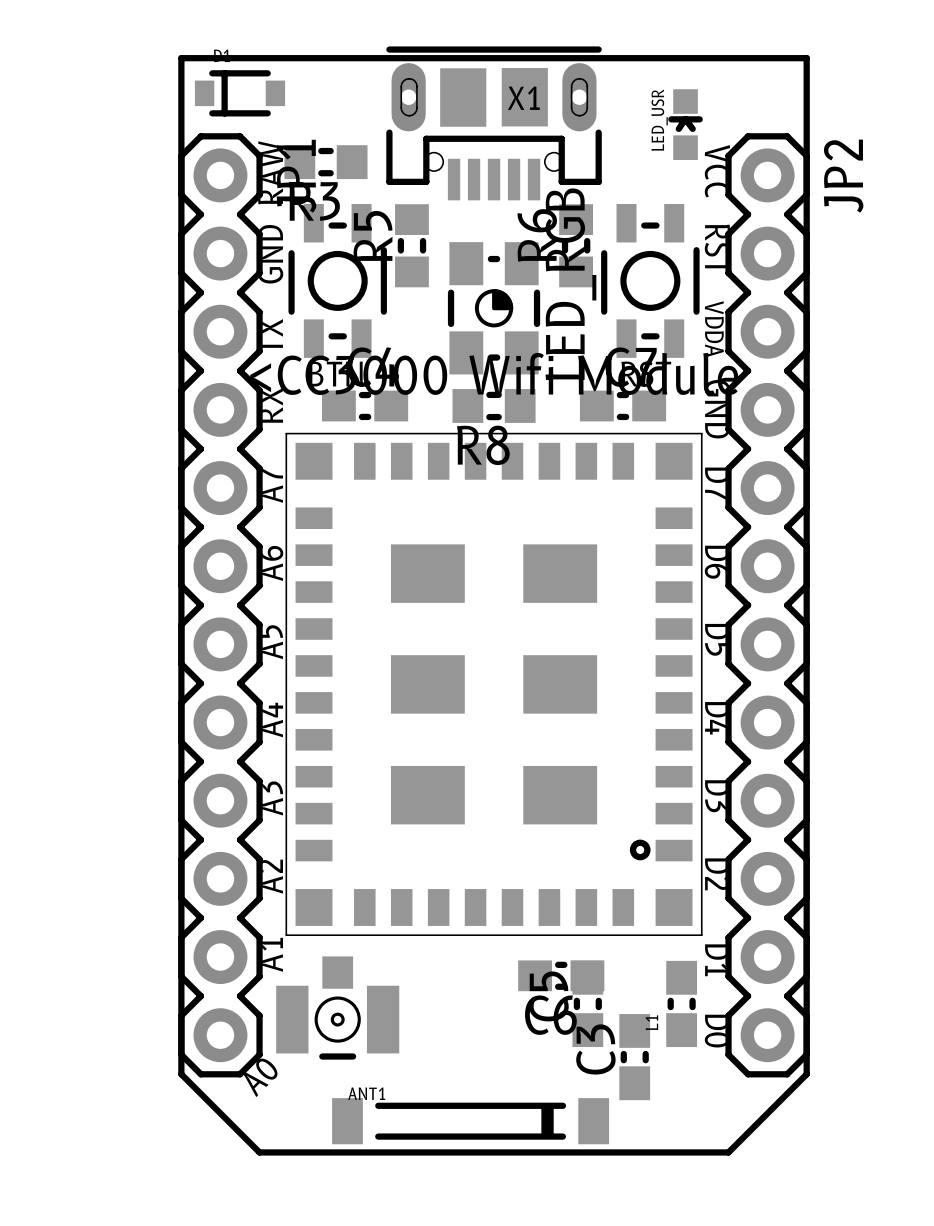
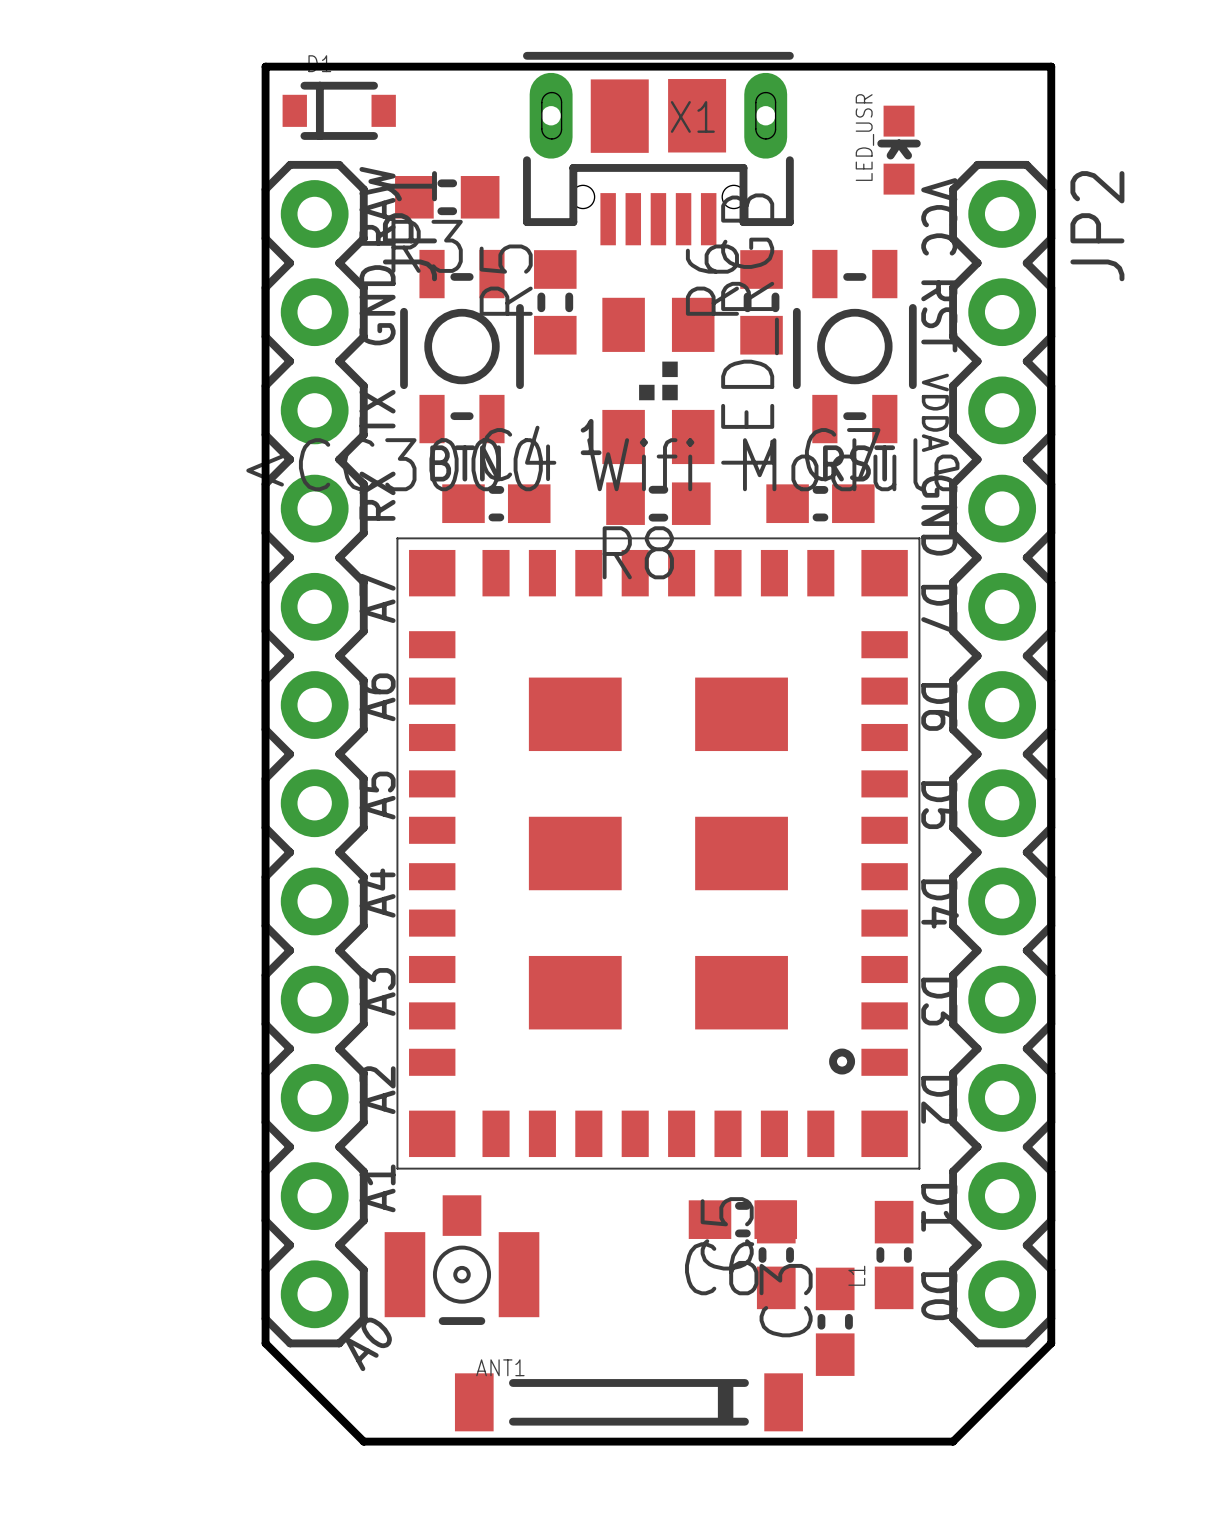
LED_RGB footprint: [447, 242, 541, 375] -> [602, 297, 715, 465]

